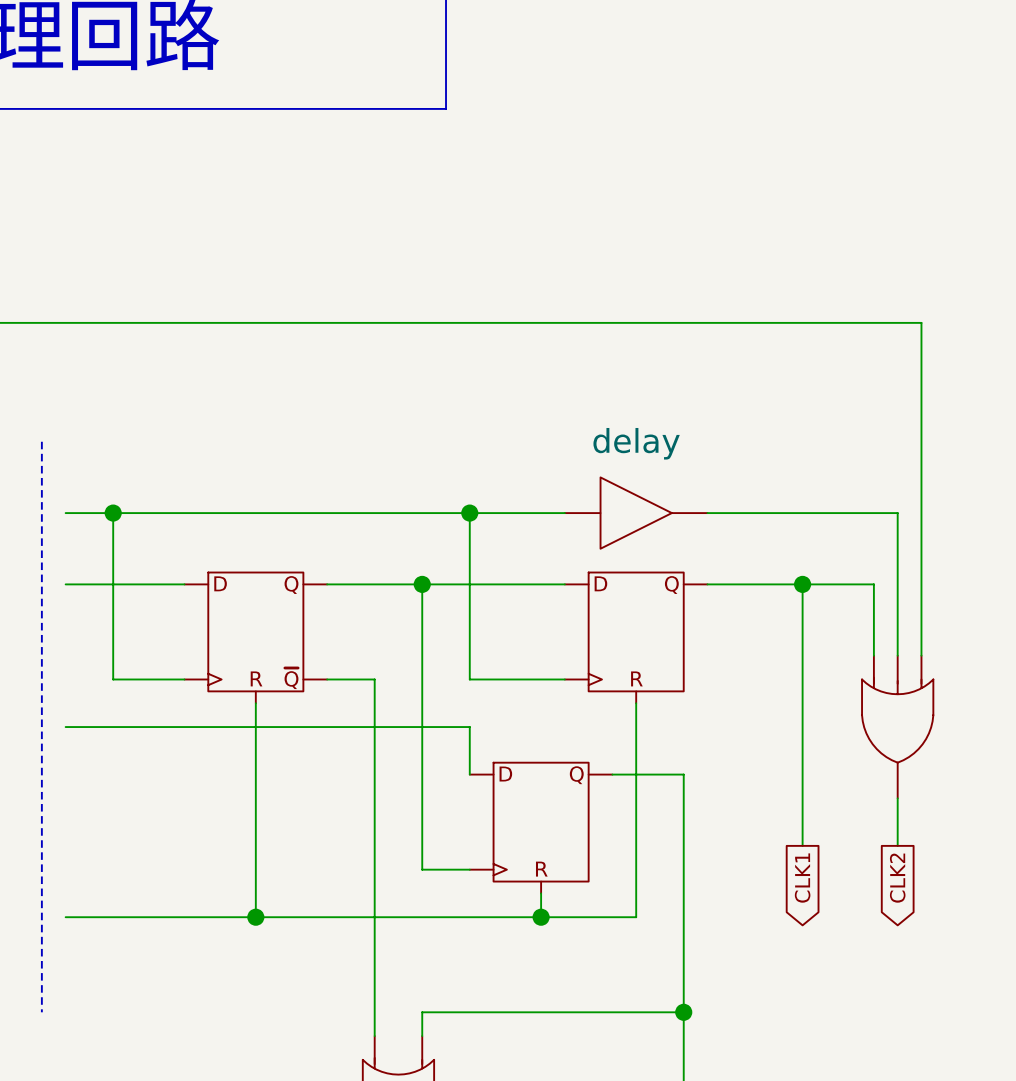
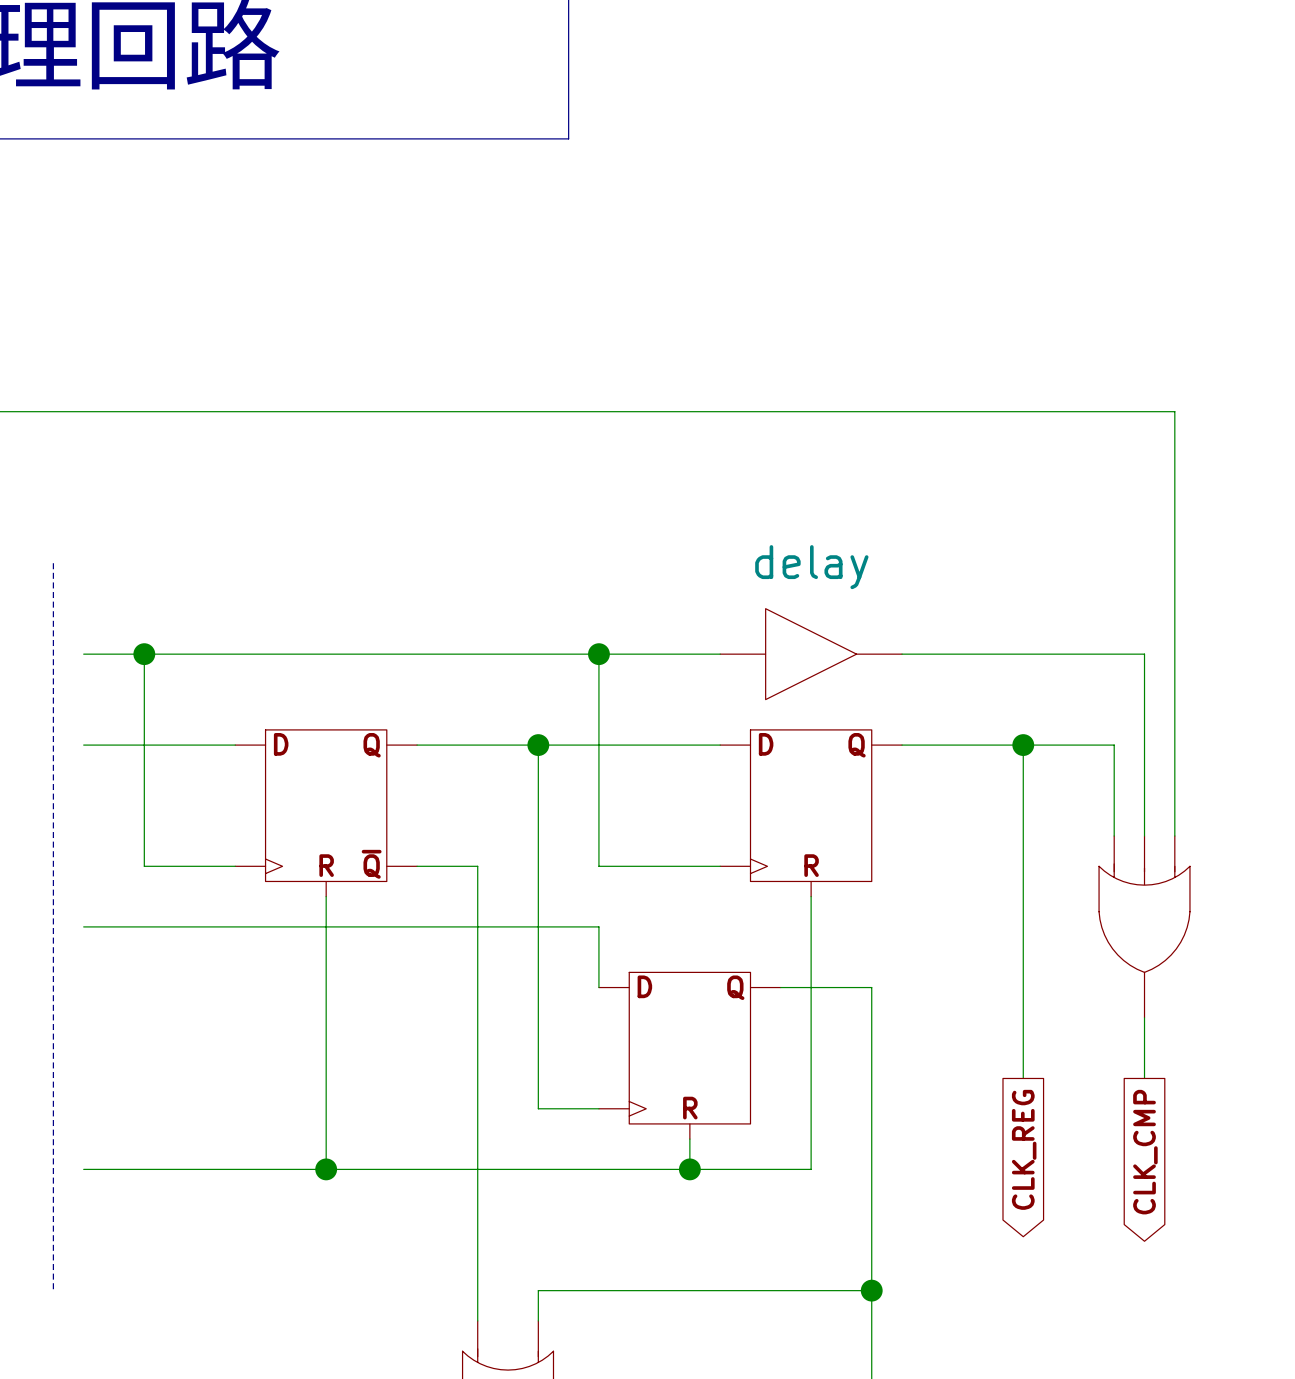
global label: CLK1 (802, 878) -> CLK_REG (1024, 1149)
global label: CLK2 (897, 878) -> CLK_CMP (1145, 1152)

